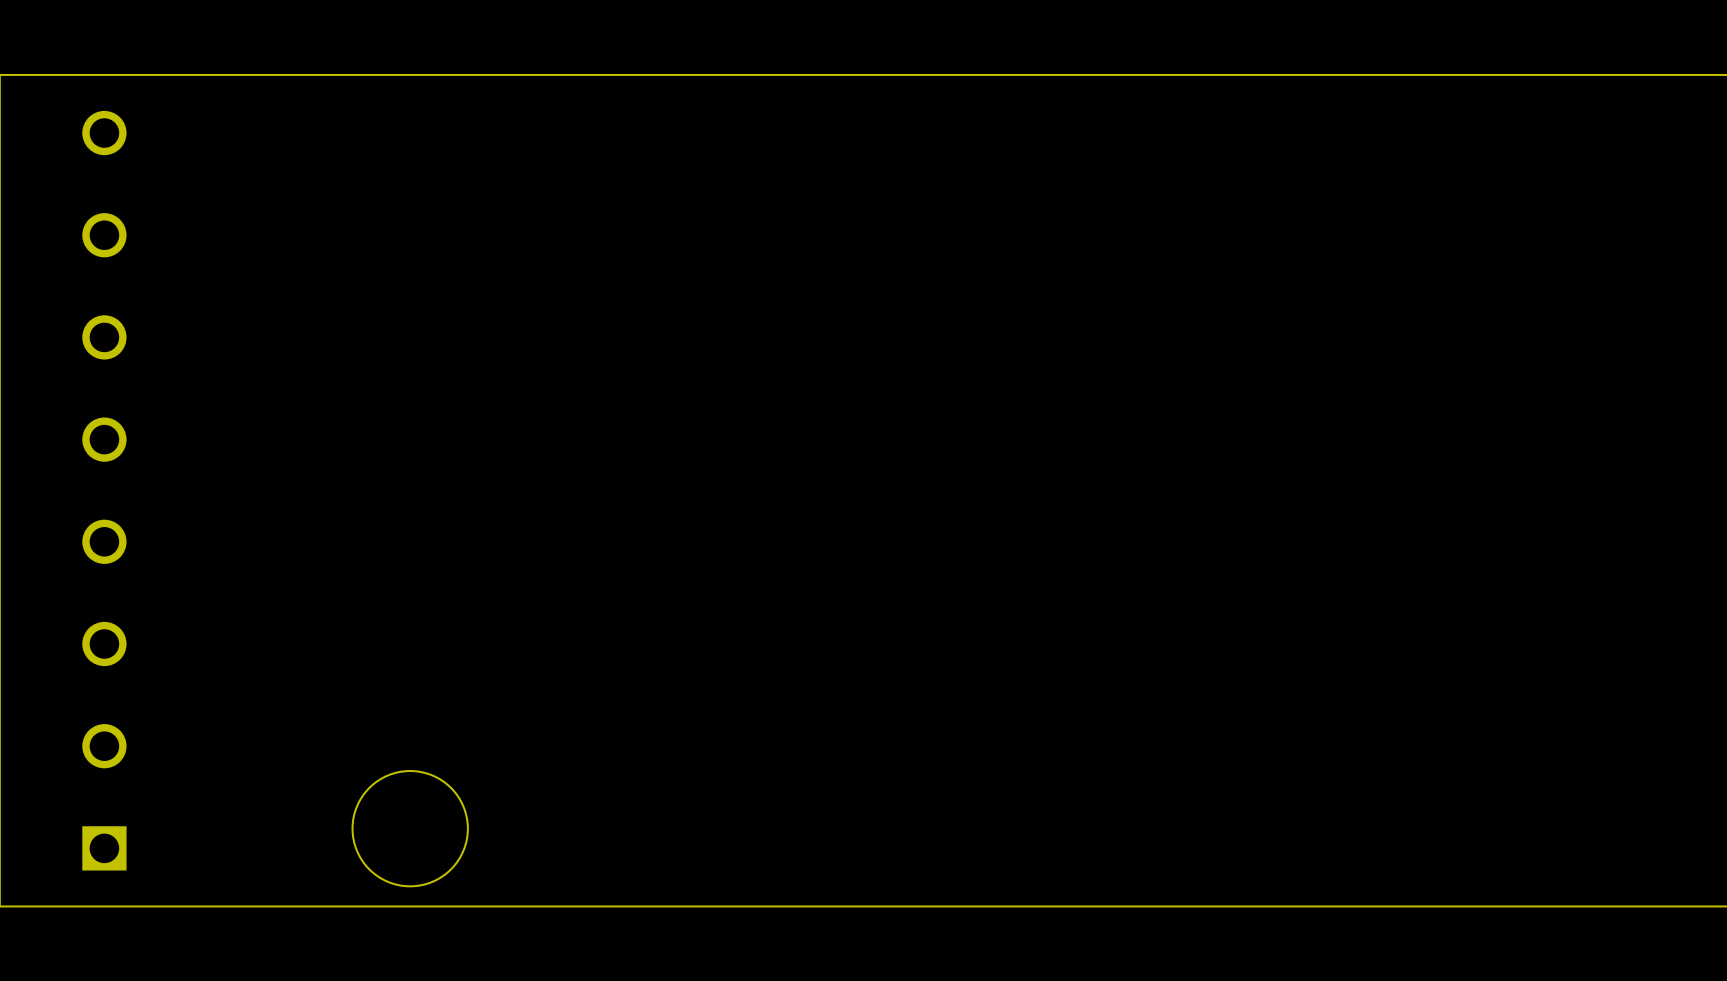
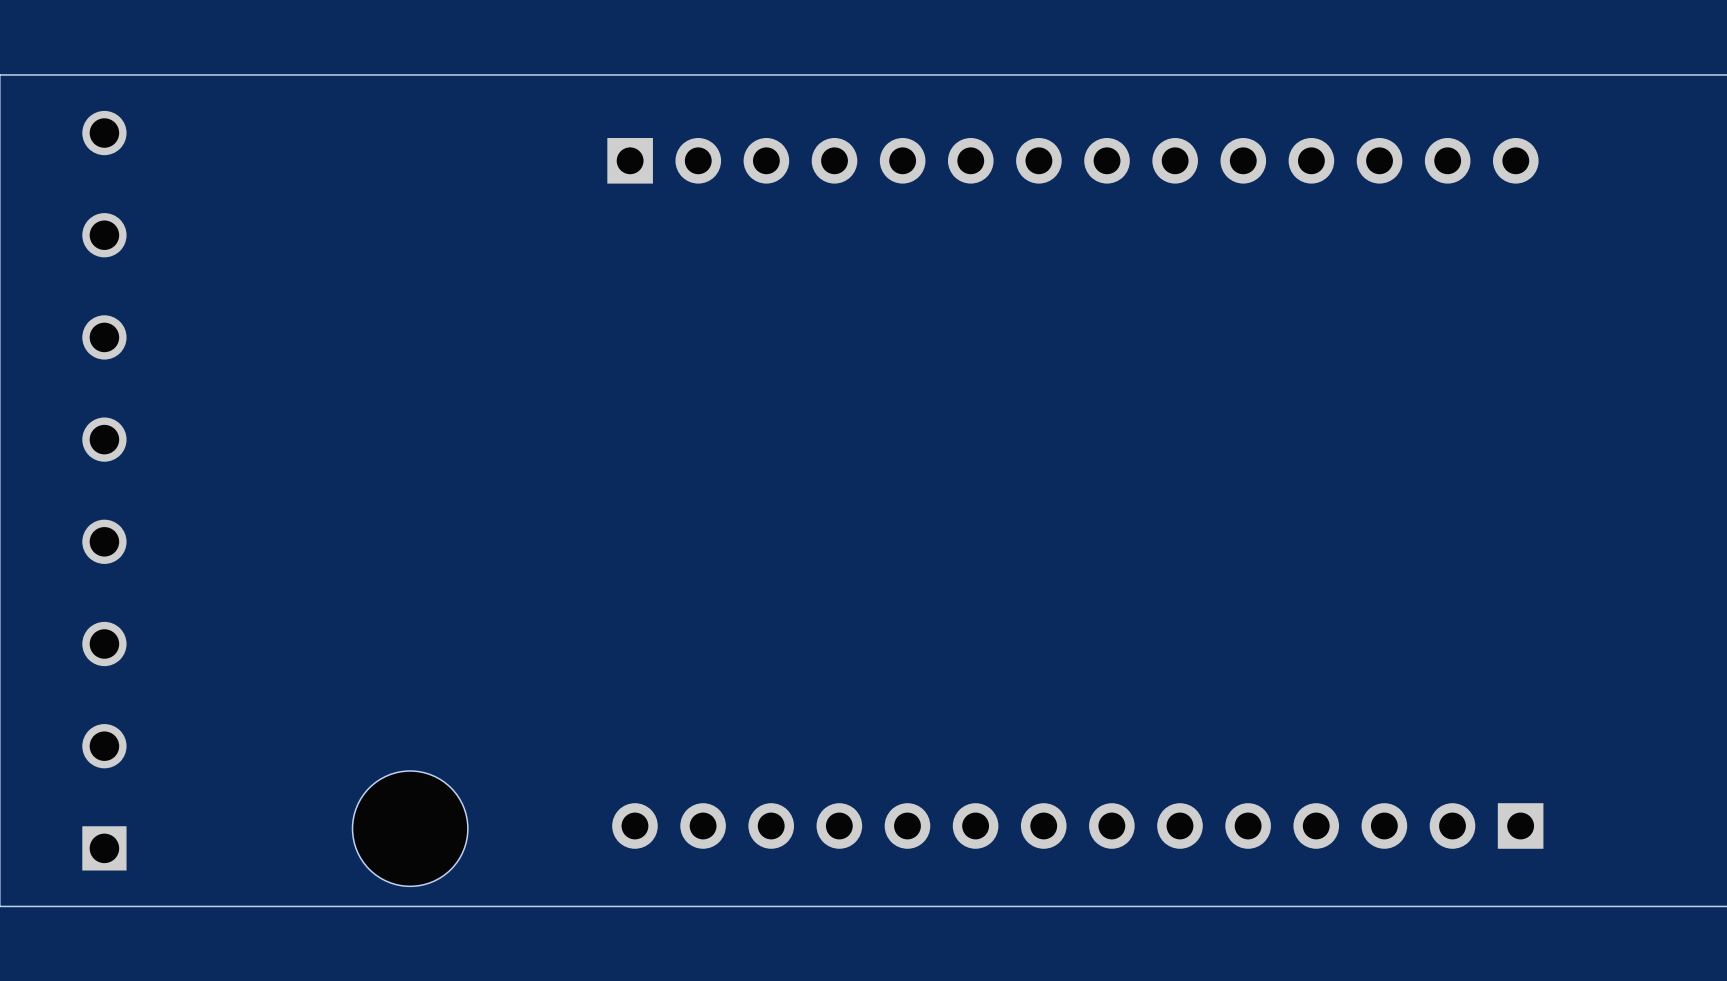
part: none -> (1072, 160)
part: none -> (1077, 825)

